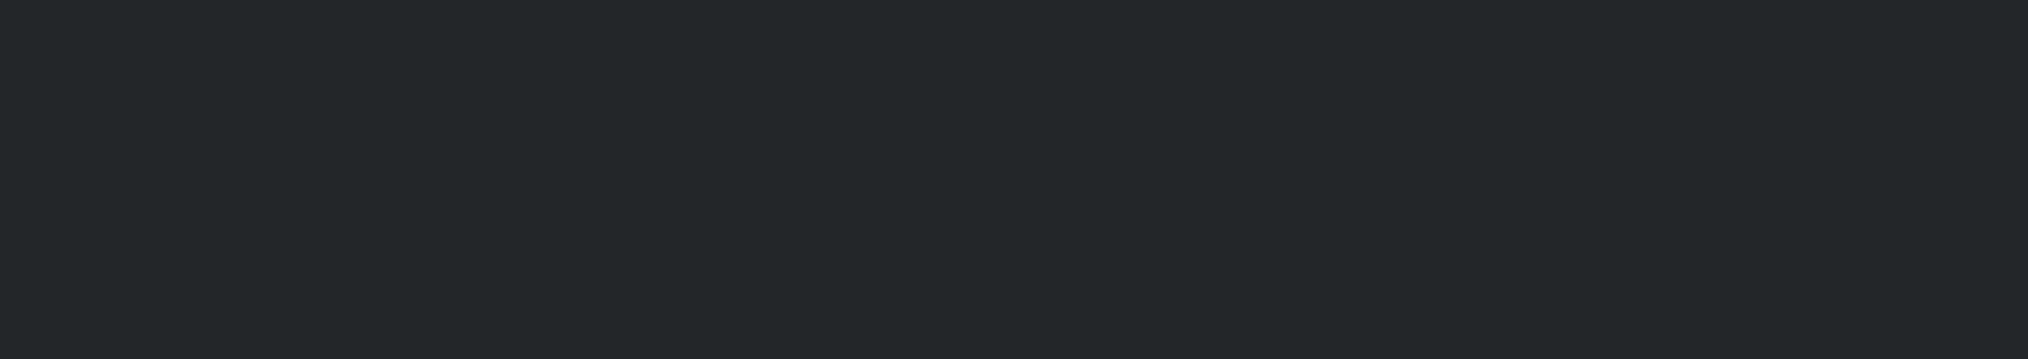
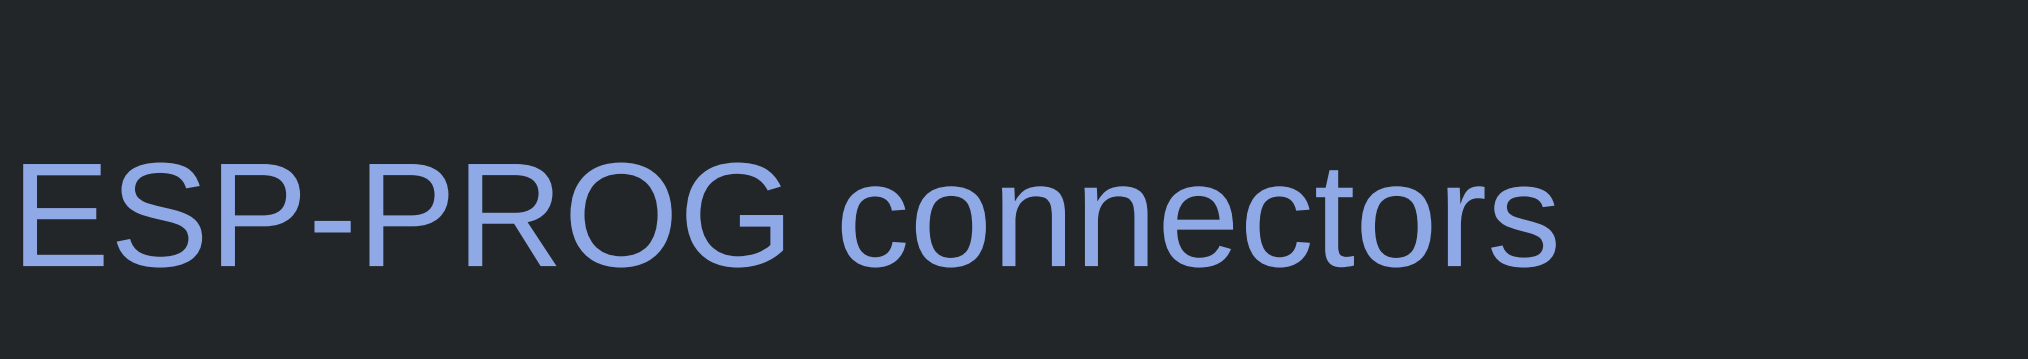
text: none -> ESP-PROG connectors (789, 215)

